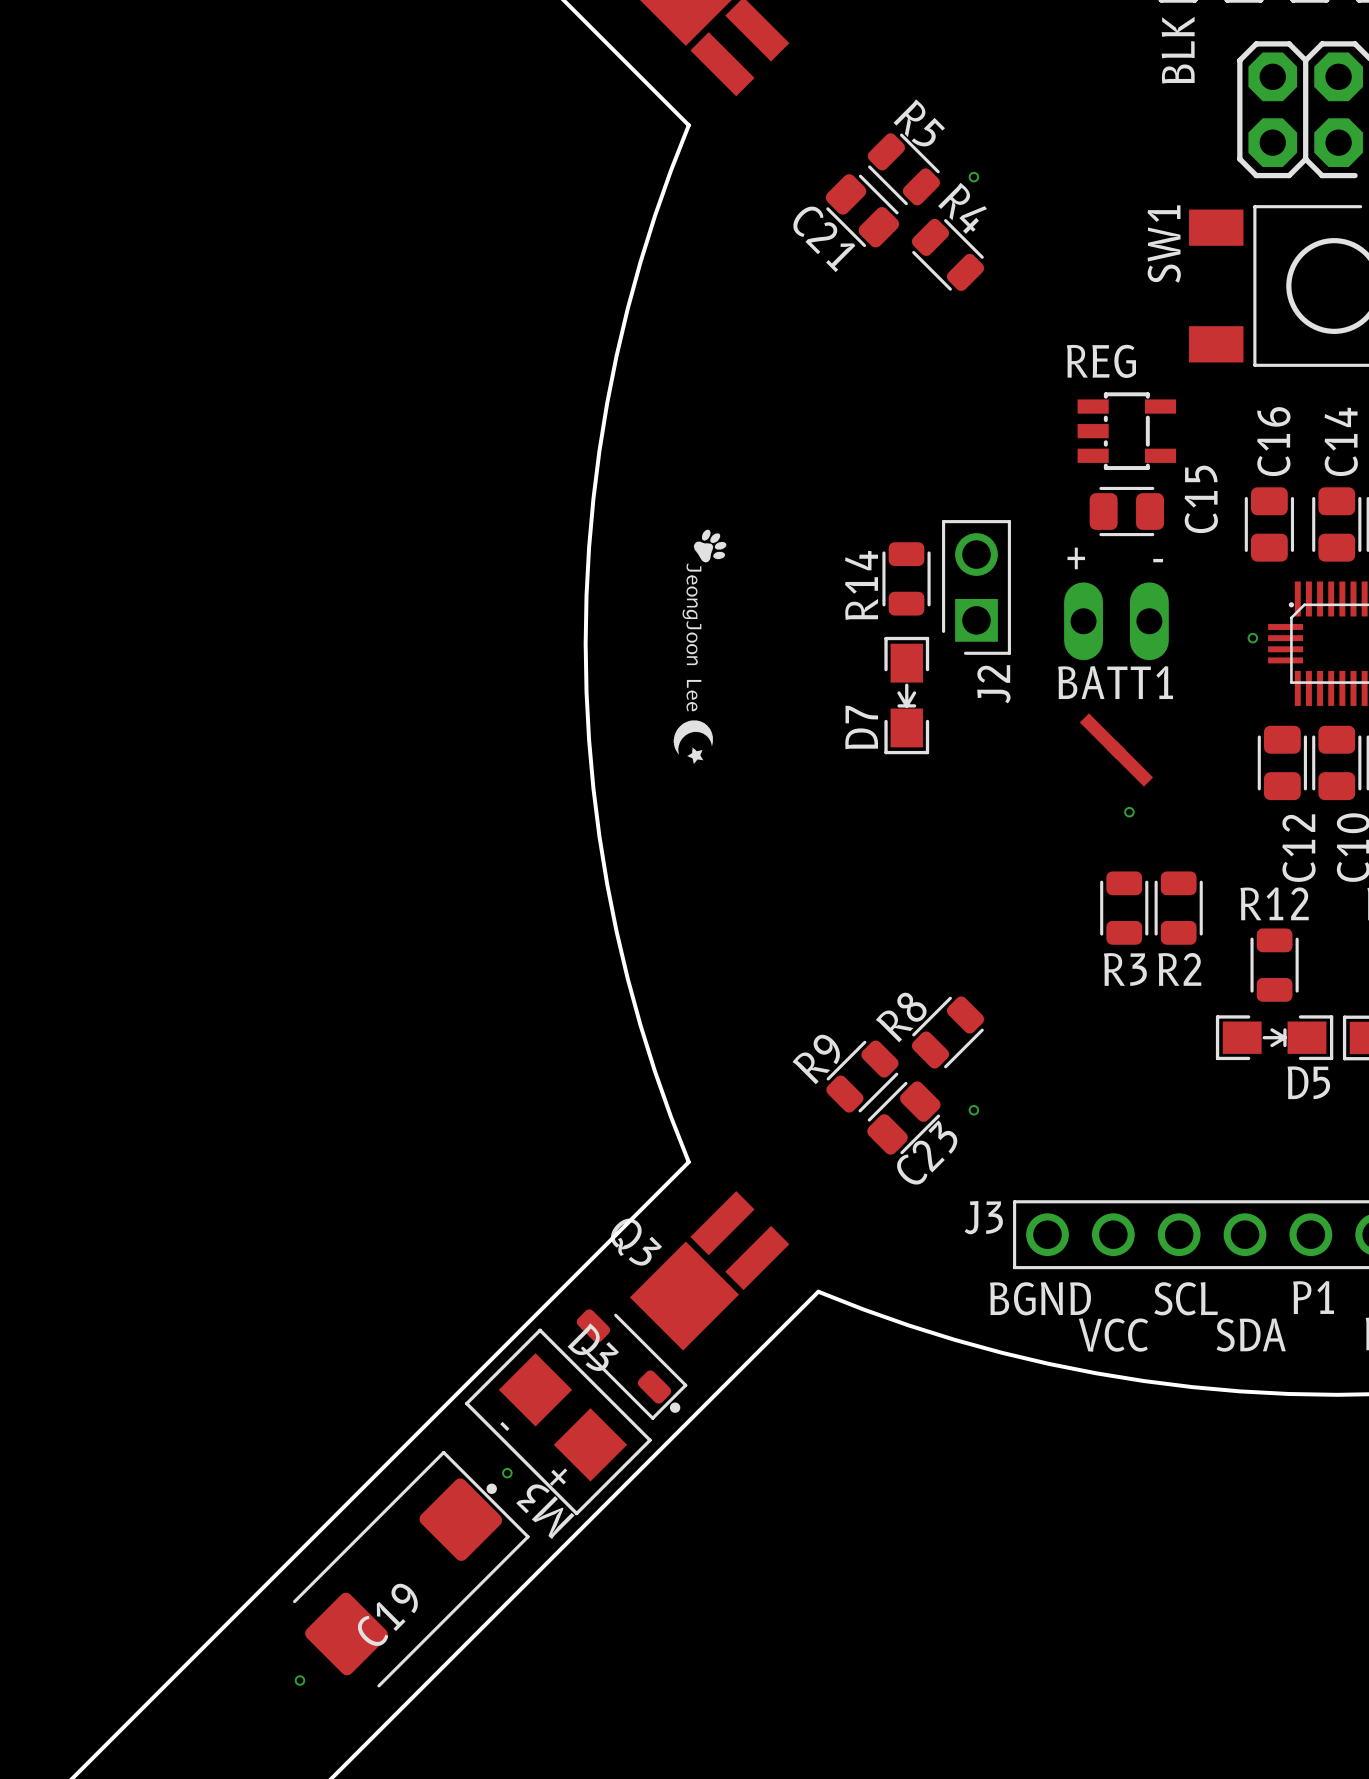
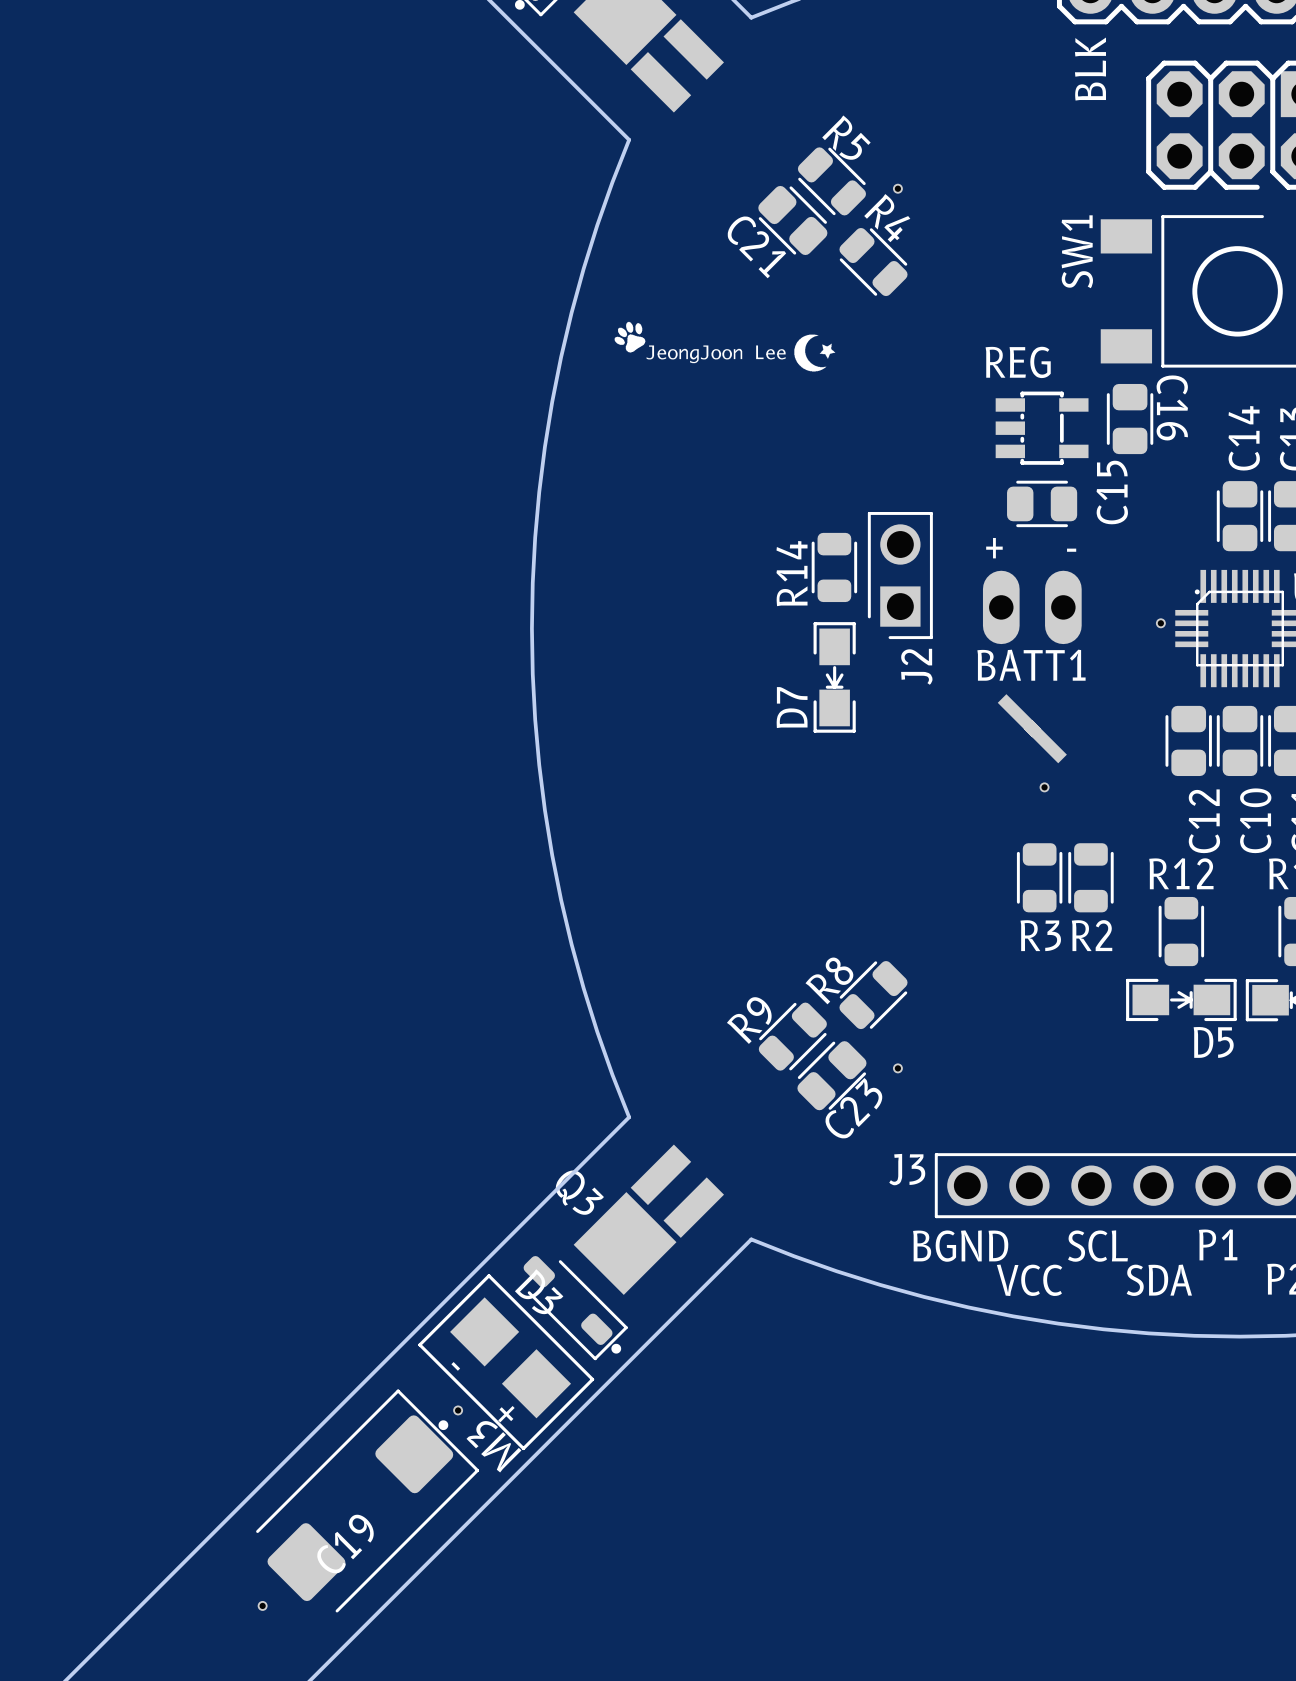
drawing: none -> [614, 321, 836, 372]
C16 name rotation: 0° (1273, 441) -> 180° (1172, 407)
C16 position: (1269, 524) -> (1130, 419)
drawing: [673, 529, 727, 764] -> none

